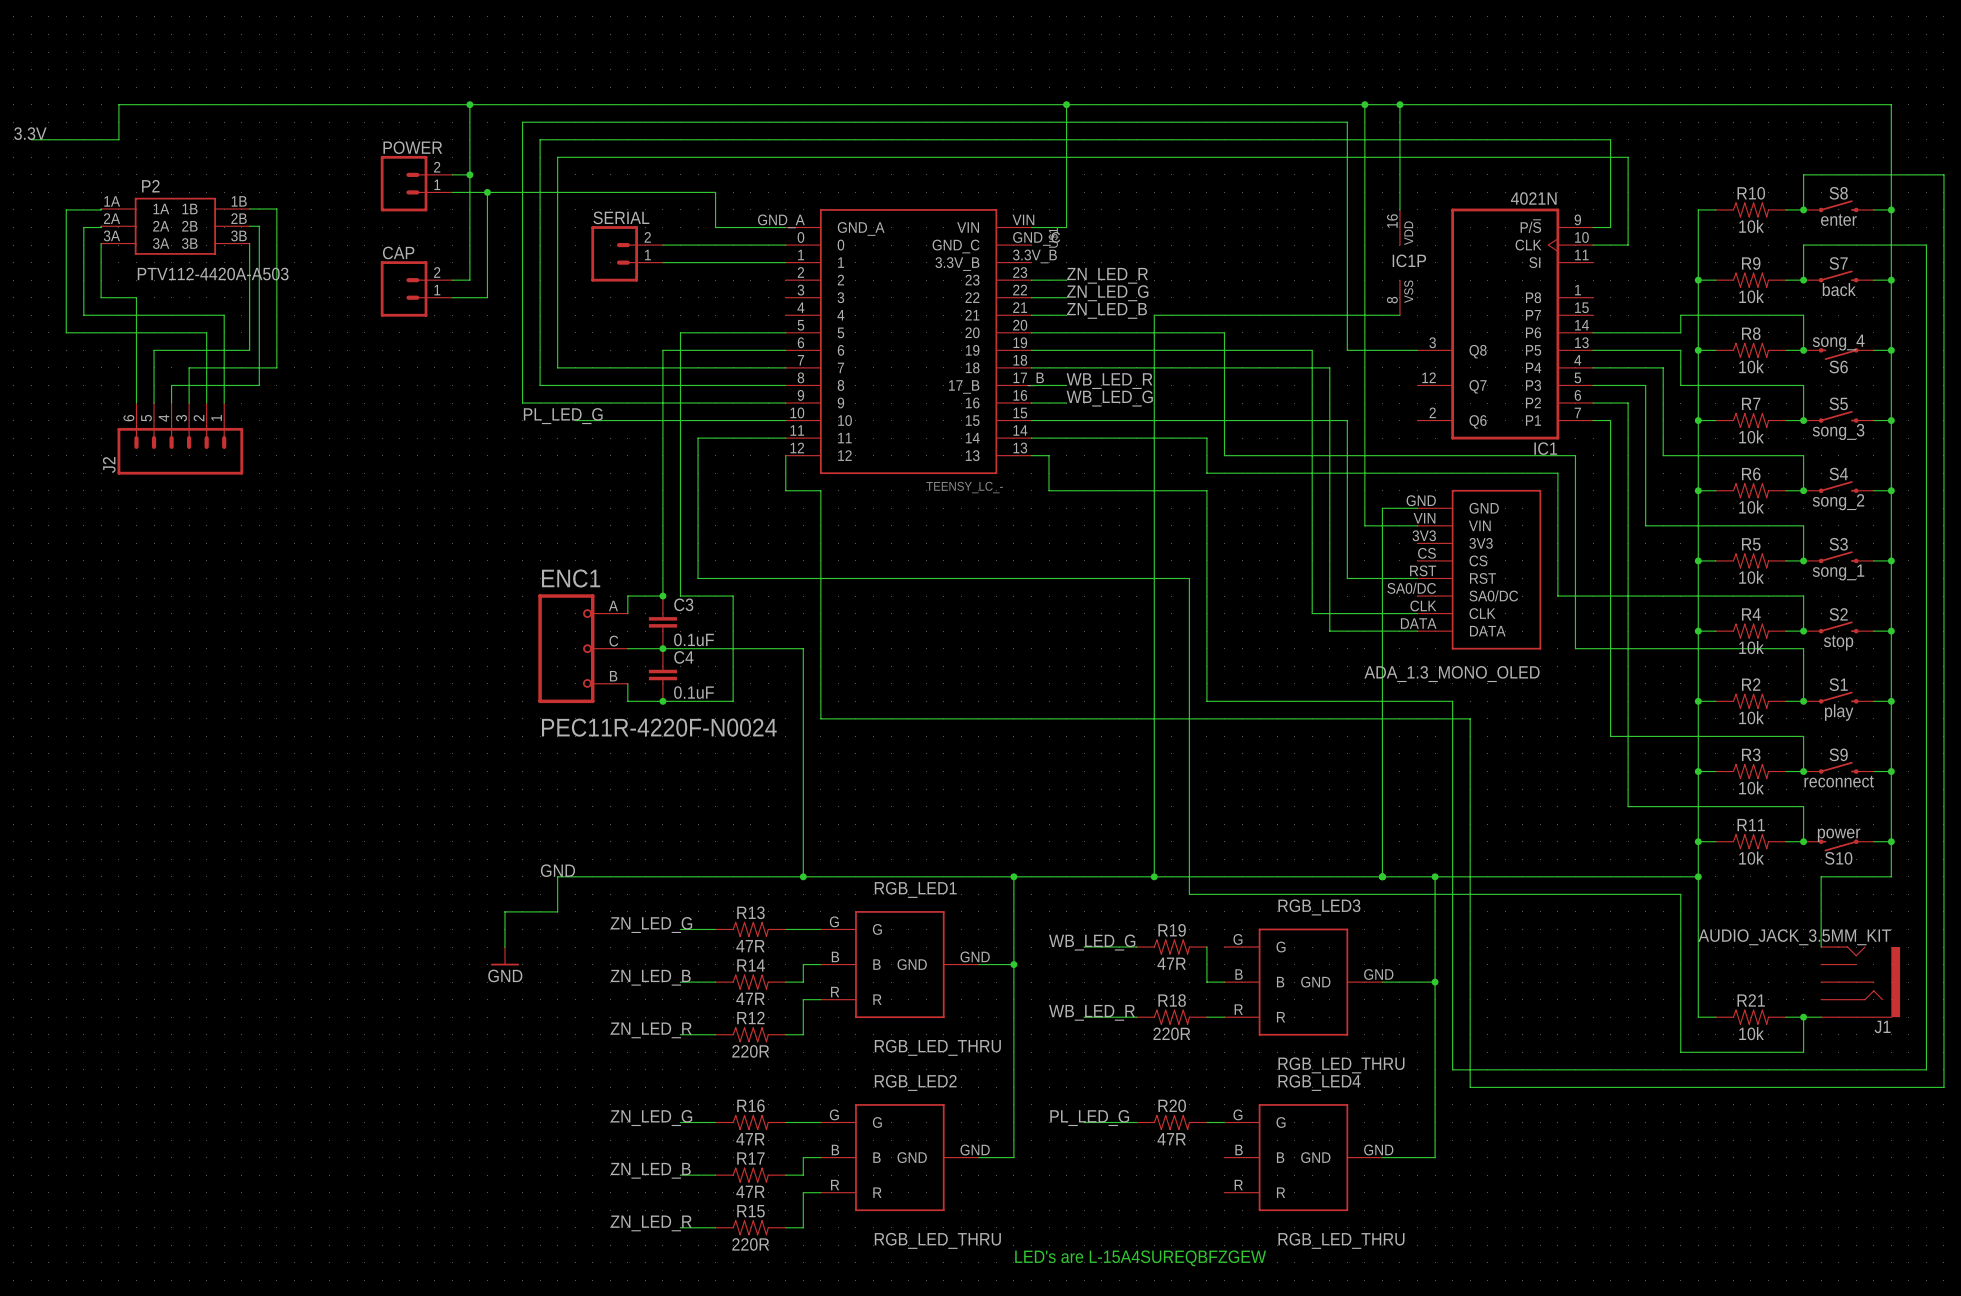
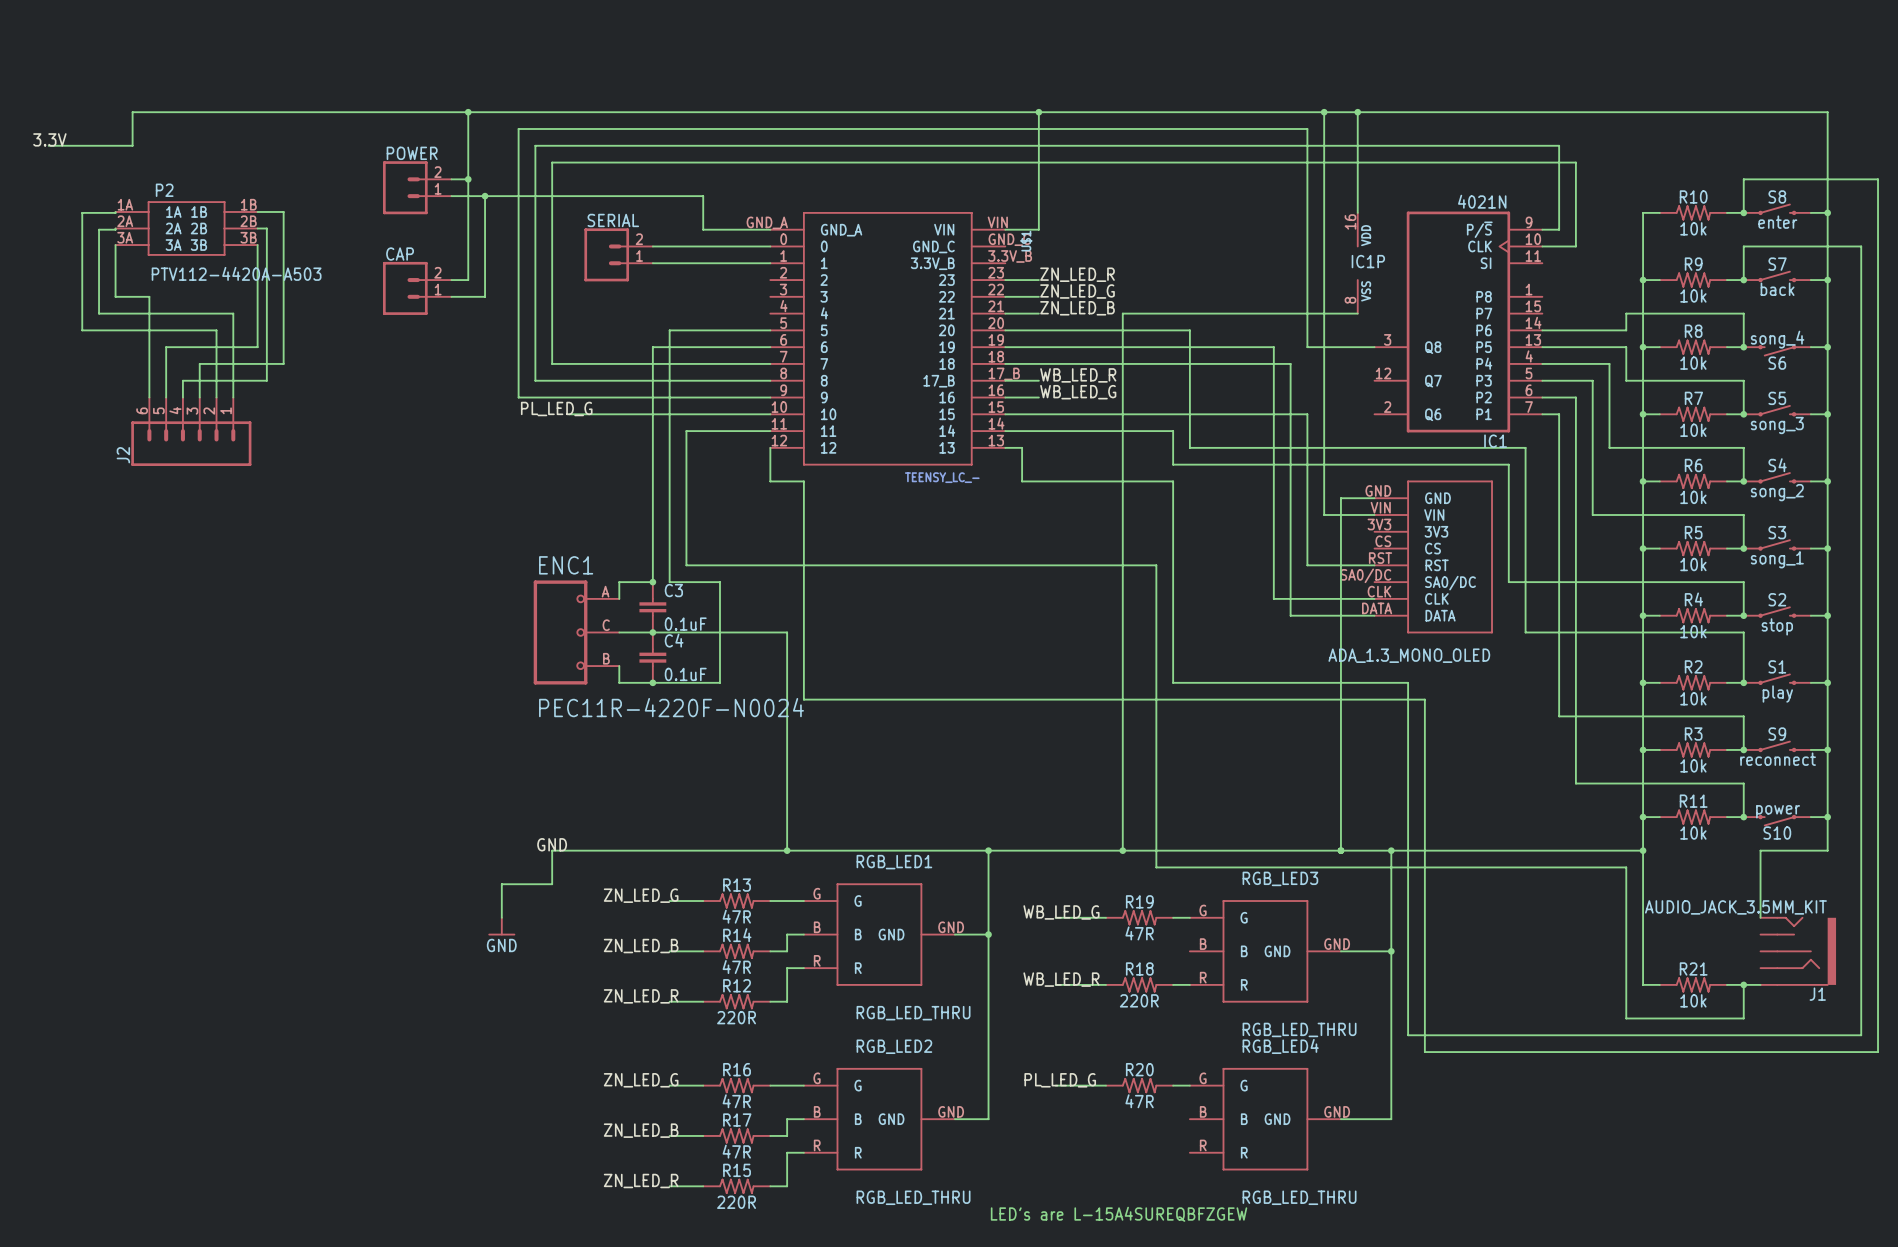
wire: (1206, 947) (1206, 982) (1224, 982) -> (1173, 917) (1189, 917)

